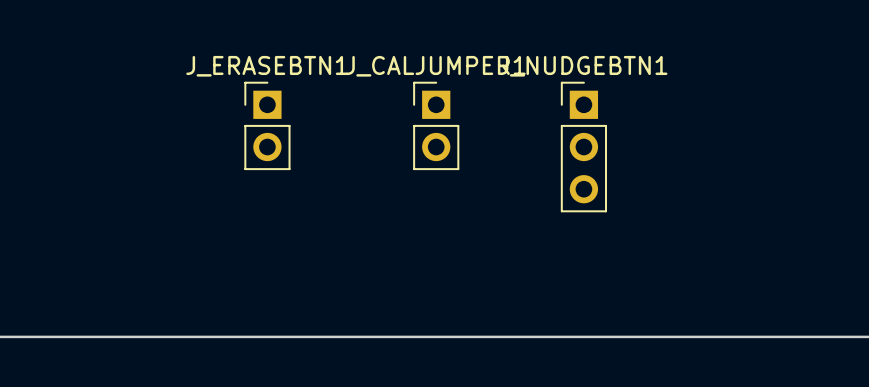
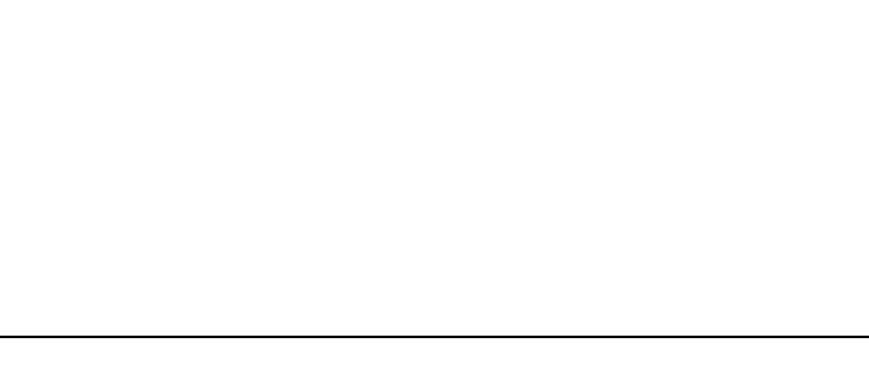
J_ERASEBTN1: (267, 125) -> none
J_CALJUMPER1: (436, 125) -> none
J_NUDGEBTN1: (583, 147) -> none

